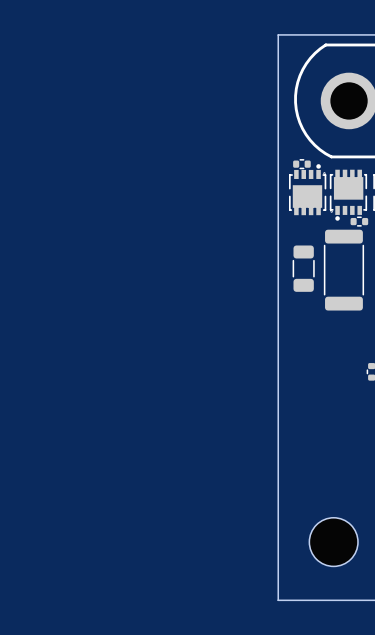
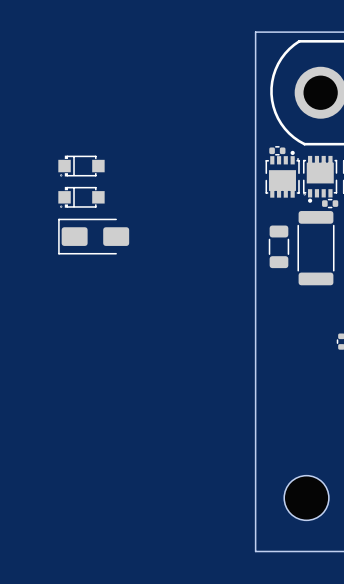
part: none -> (81, 166)
part: none -> (81, 197)
part: none -> (93, 236)

